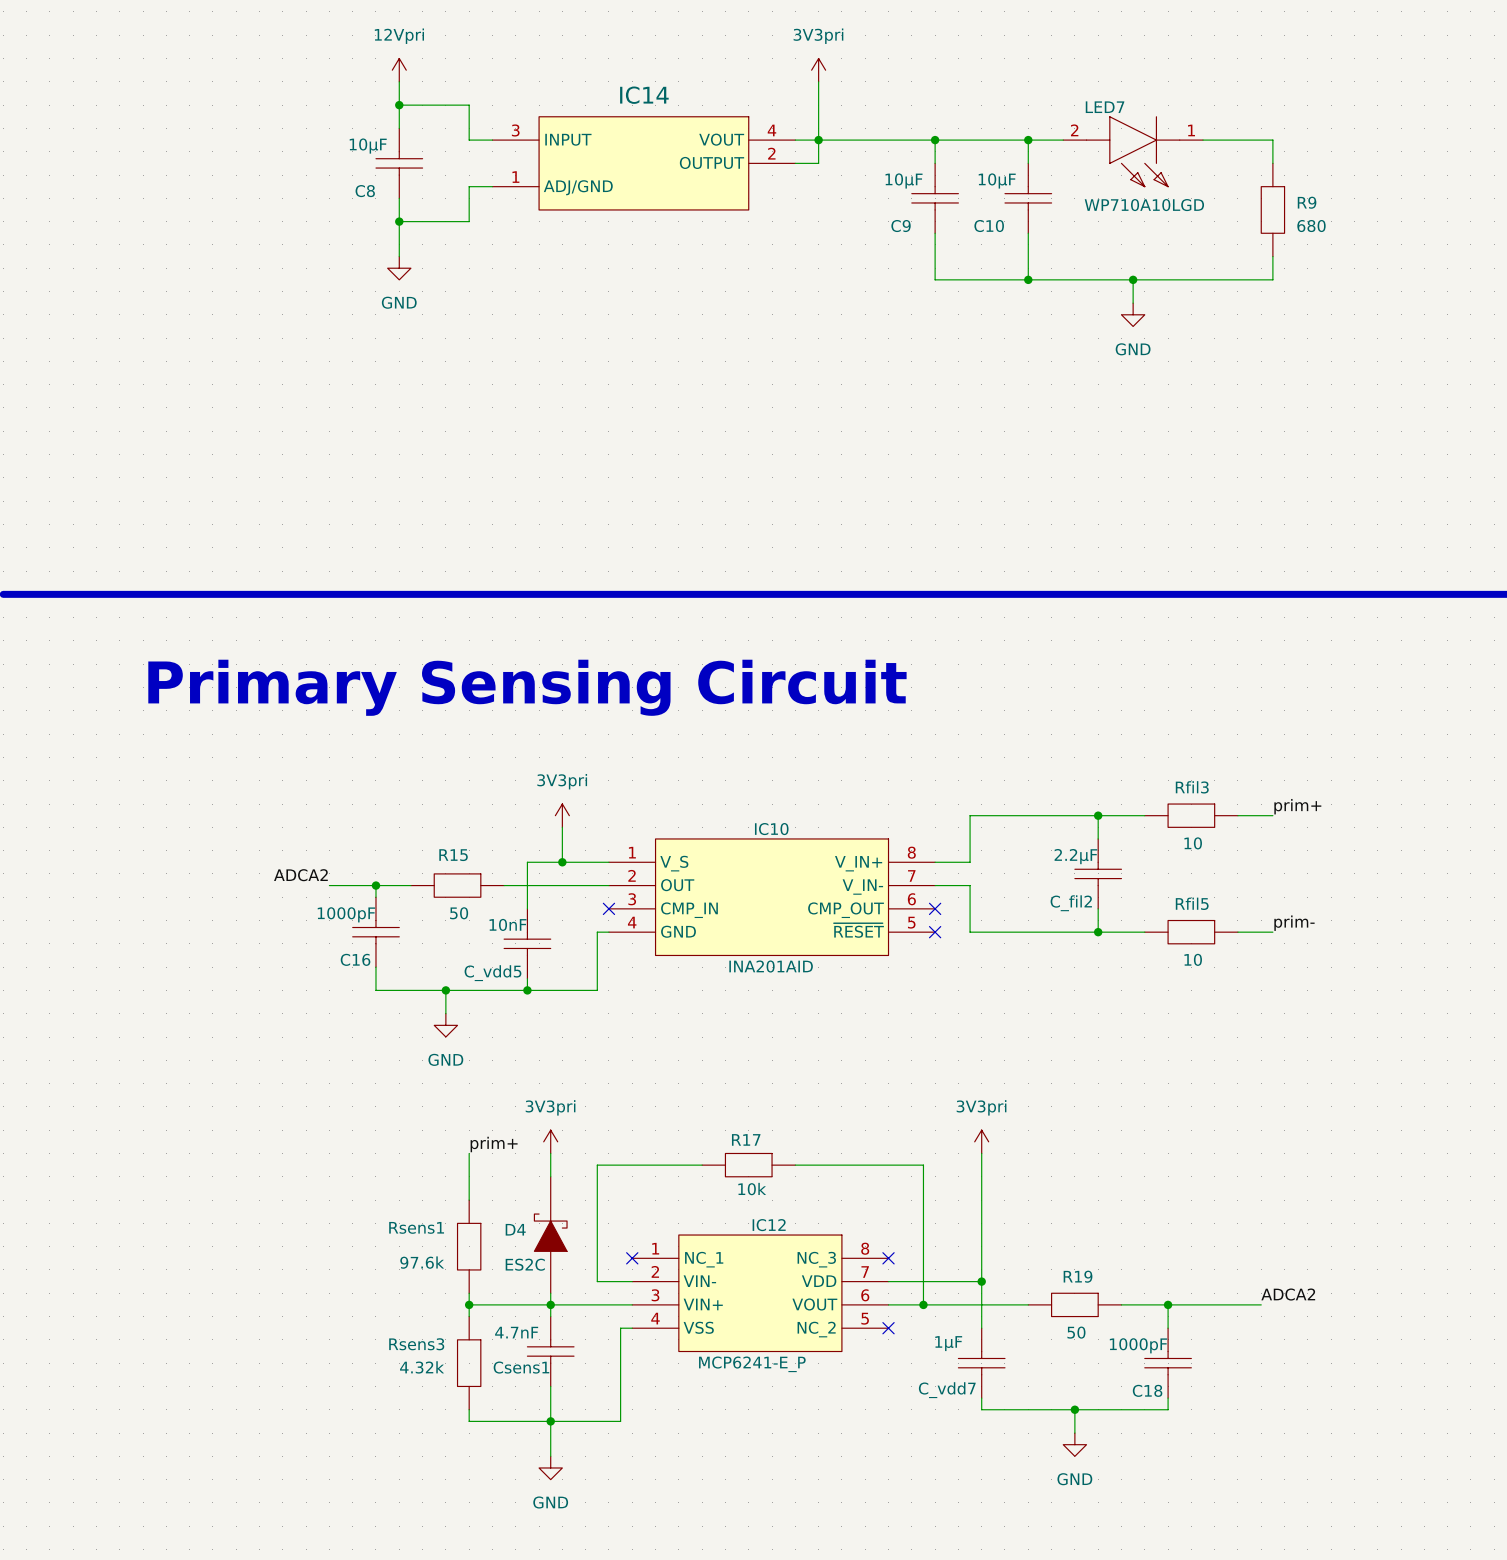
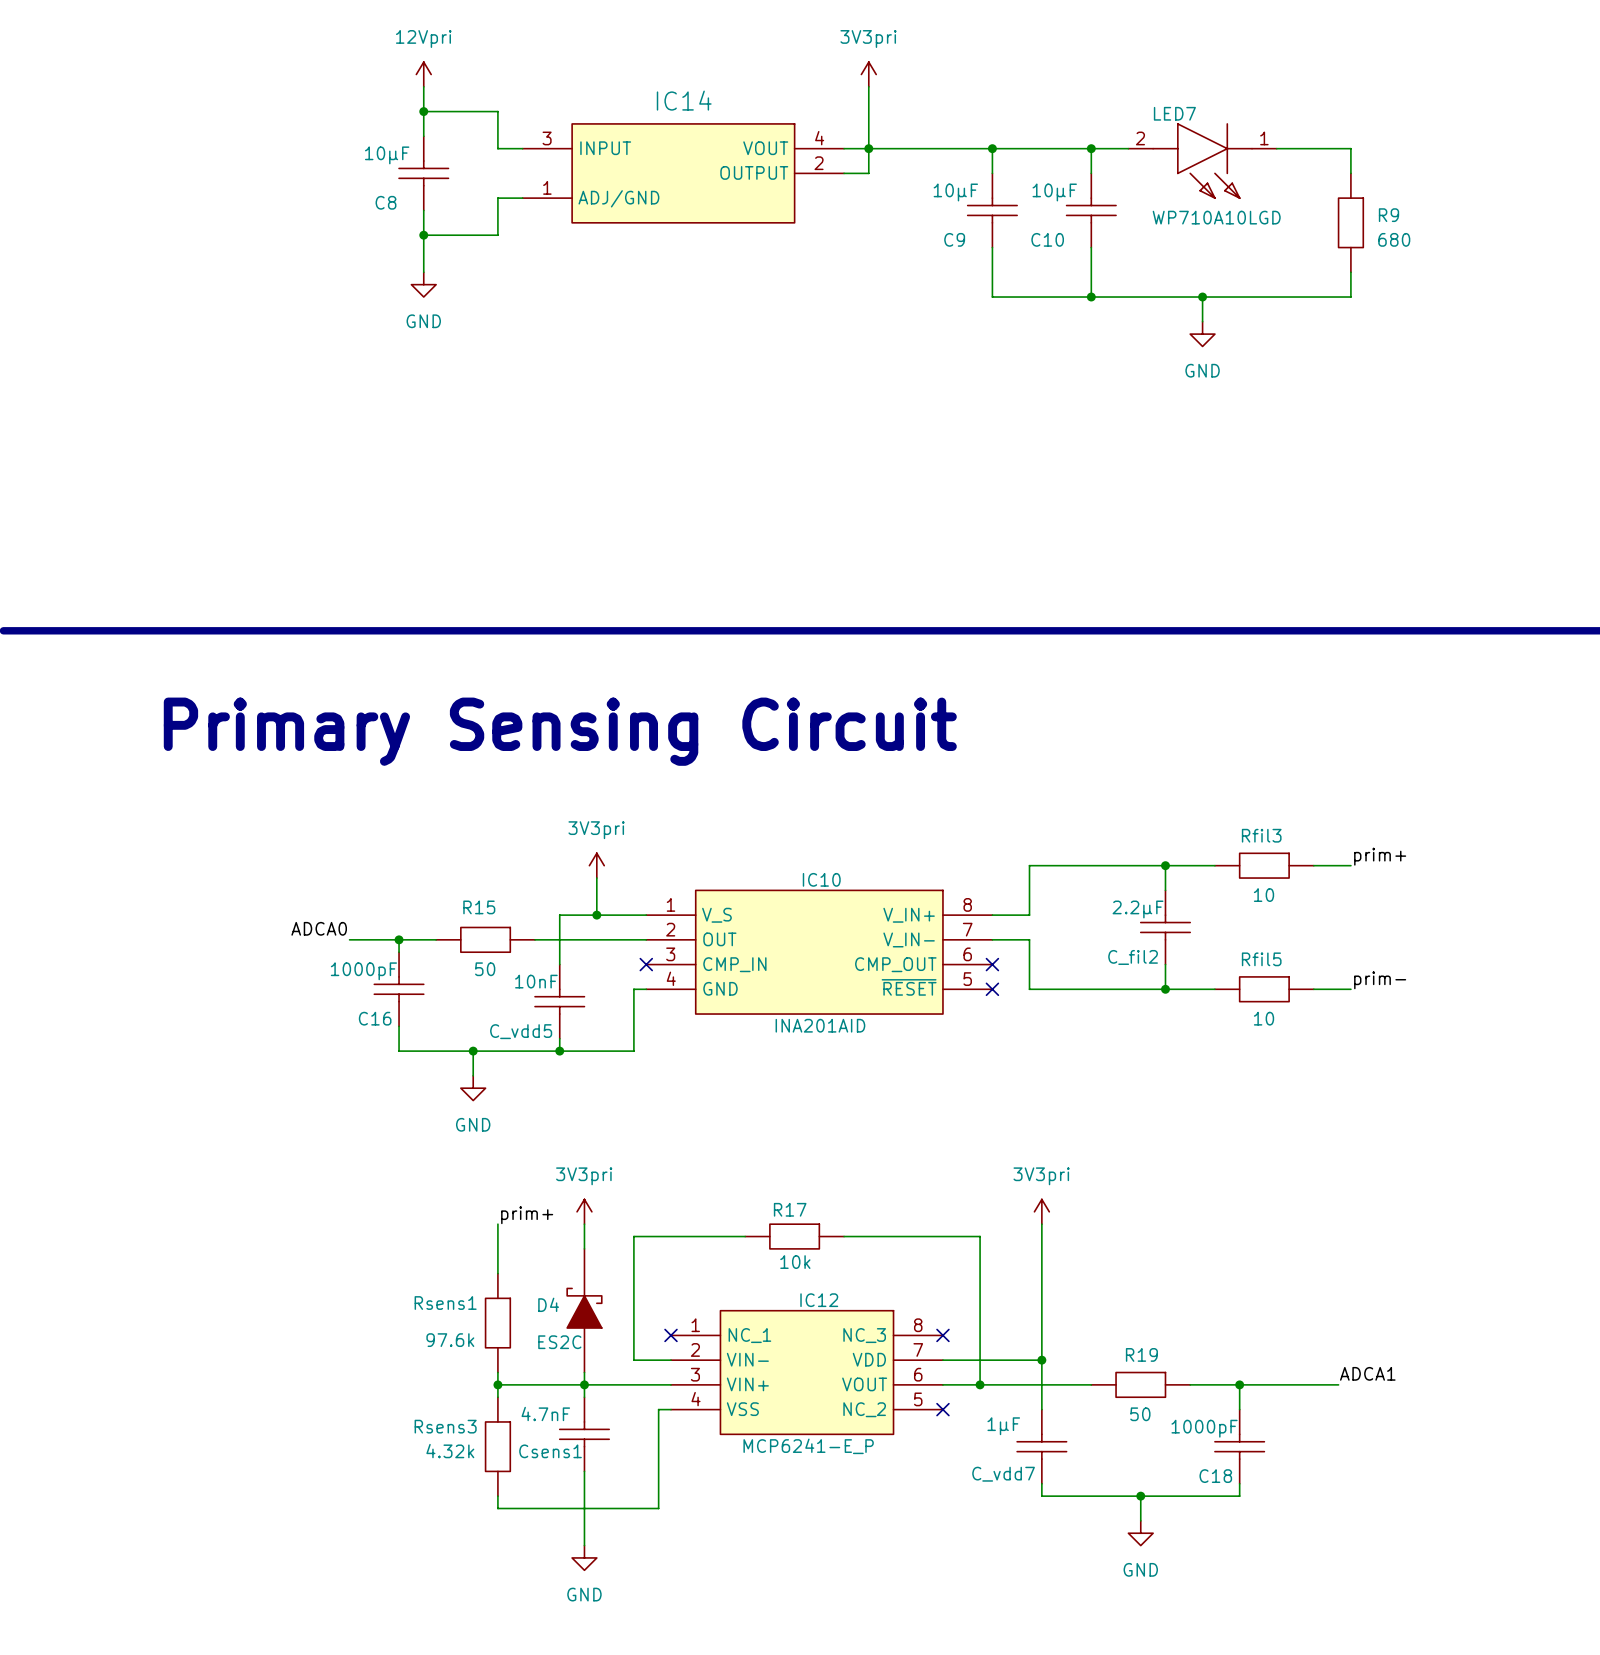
label: ADCA2 (300, 875) -> ADCA0 (319, 928)
label: ADCA2 (1288, 1294) -> ADCA1 (1367, 1373)
junction: (550, 1421) -> none

